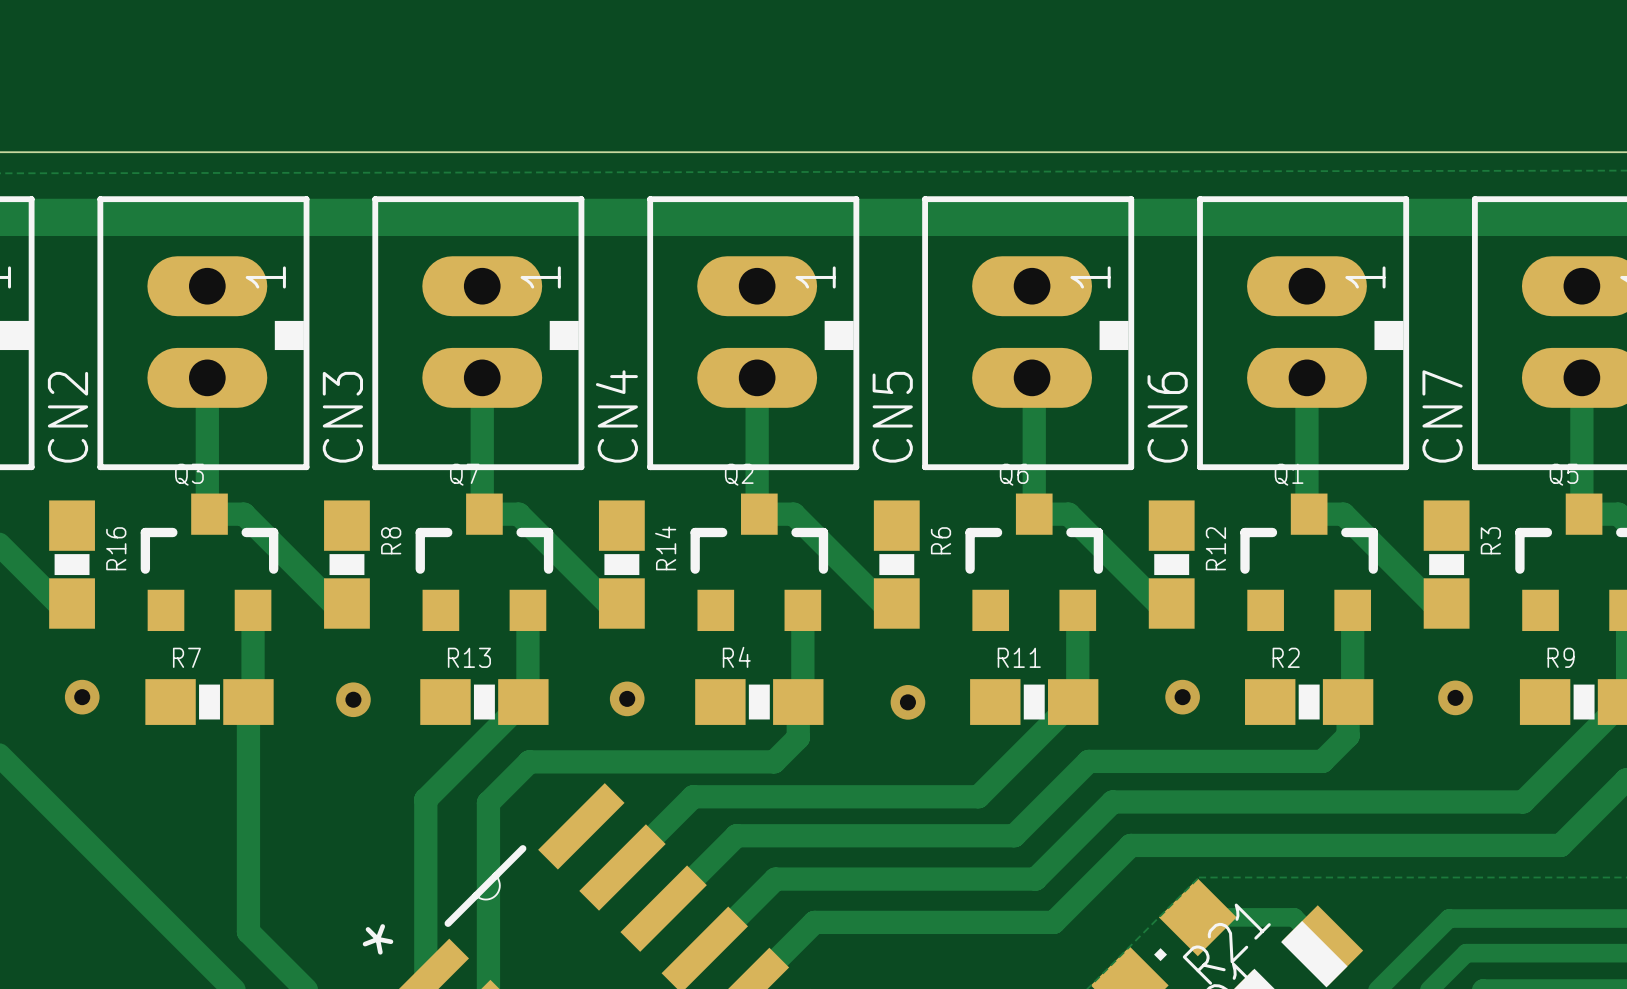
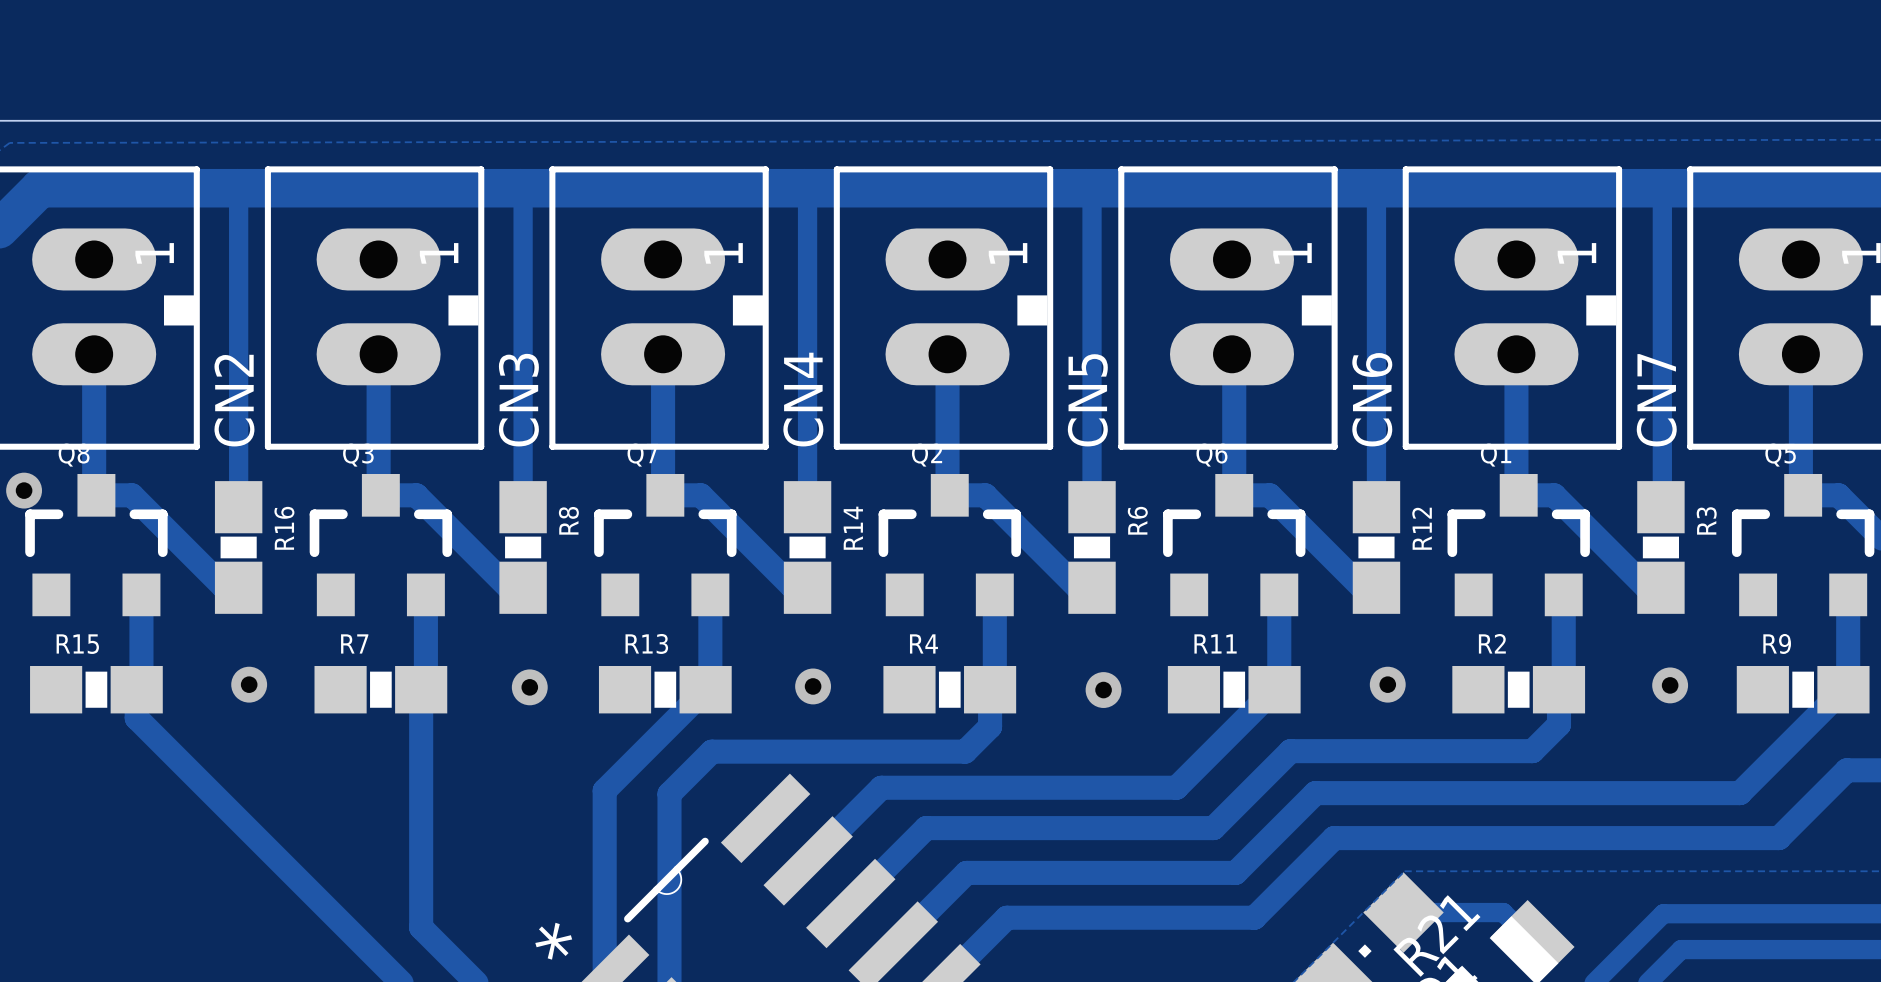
track: none -> (237, 188) (238, 507)
track: none -> (520, 188) (523, 191) (523, 507)
track: none -> (804, 188) (807, 191) (807, 507)
track: none -> (1086, 188) (1092, 194) (1092, 507)
track: none -> (1376, 188) (1376, 507)
track: none -> (1662, 188) (1660, 507)

